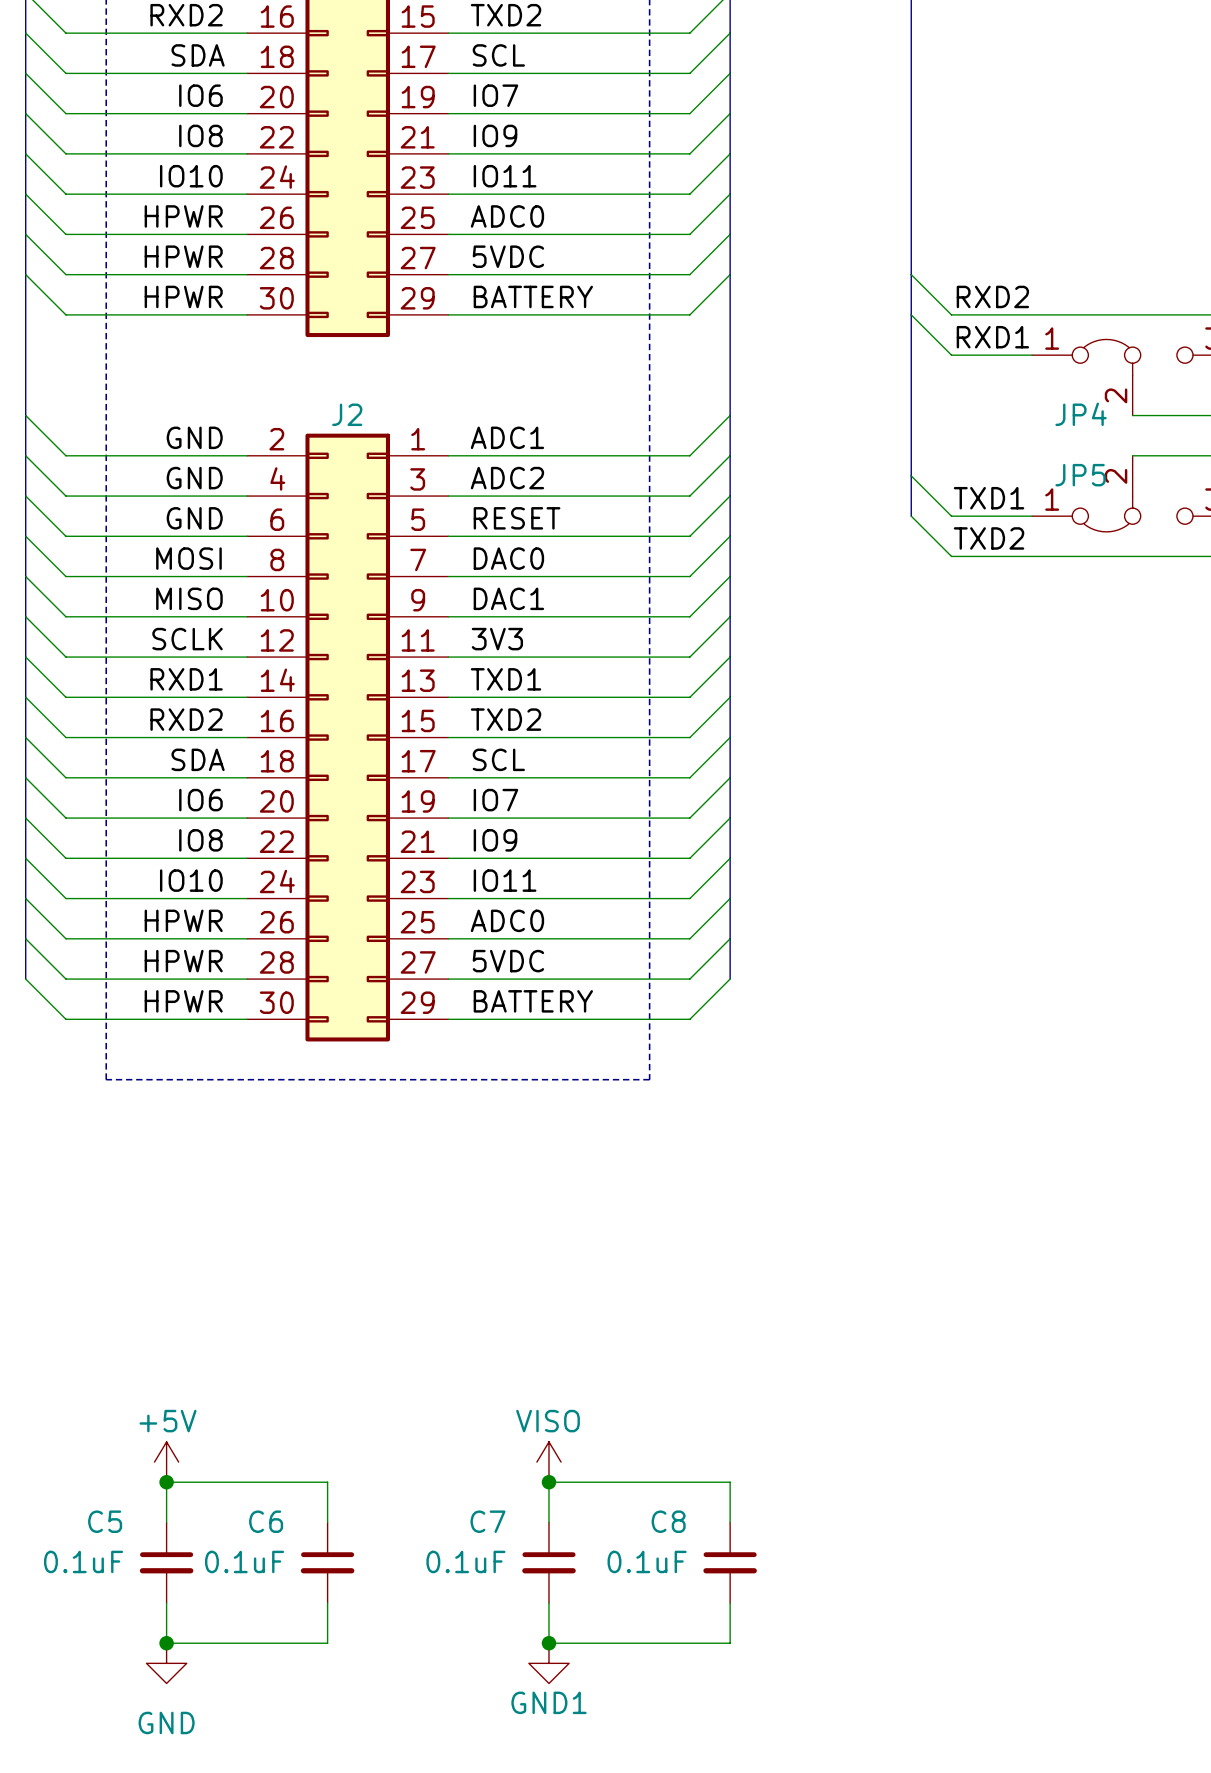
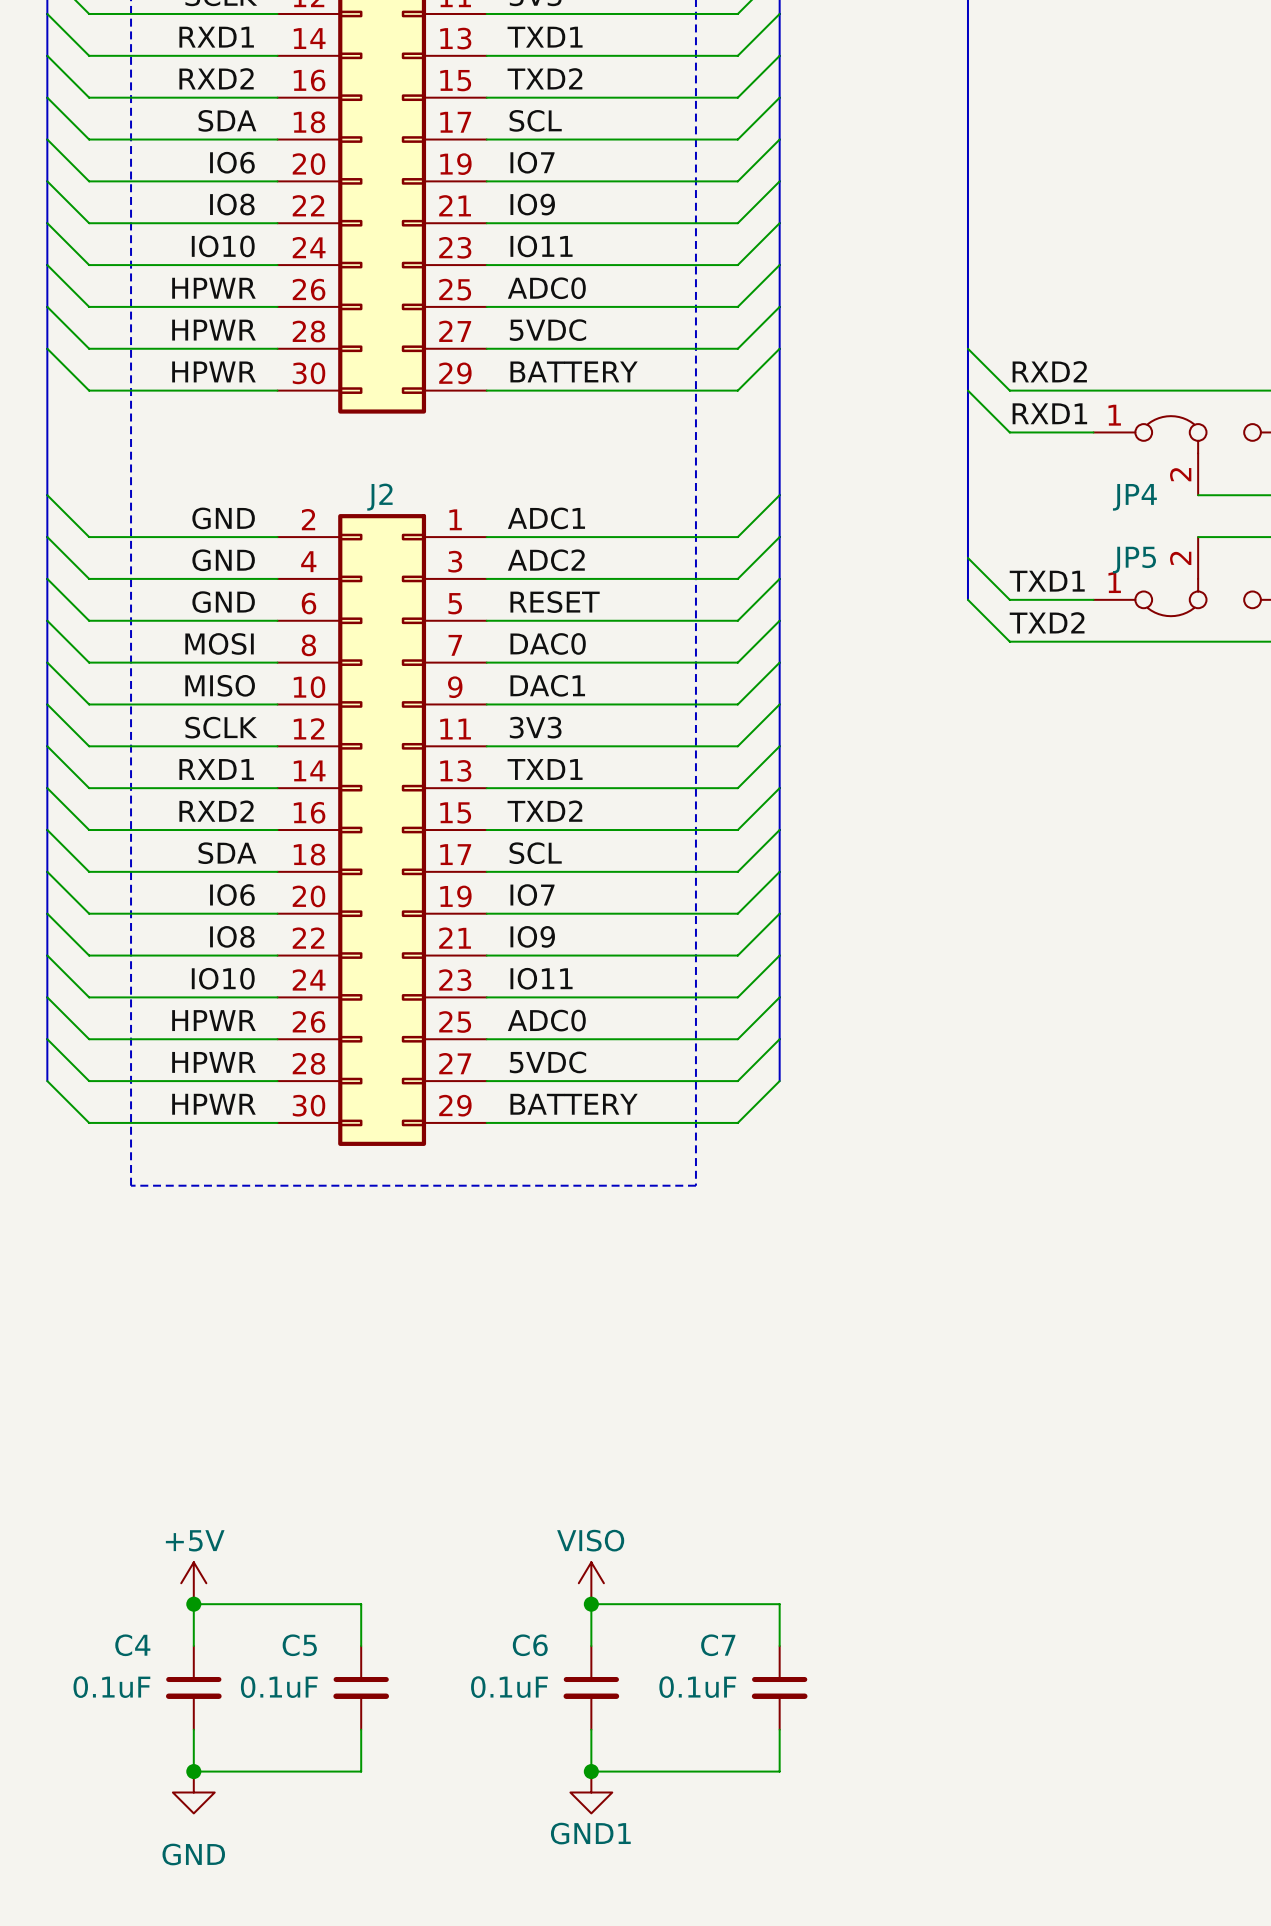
C5 name: C5 (105, 1521) -> C4 (132, 1645)
C6 name: C6 (266, 1521) -> C5 (299, 1645)
C7 name: C7 (487, 1521) -> C6 (530, 1645)
C8 name: C8 (668, 1521) -> C7 (718, 1645)

